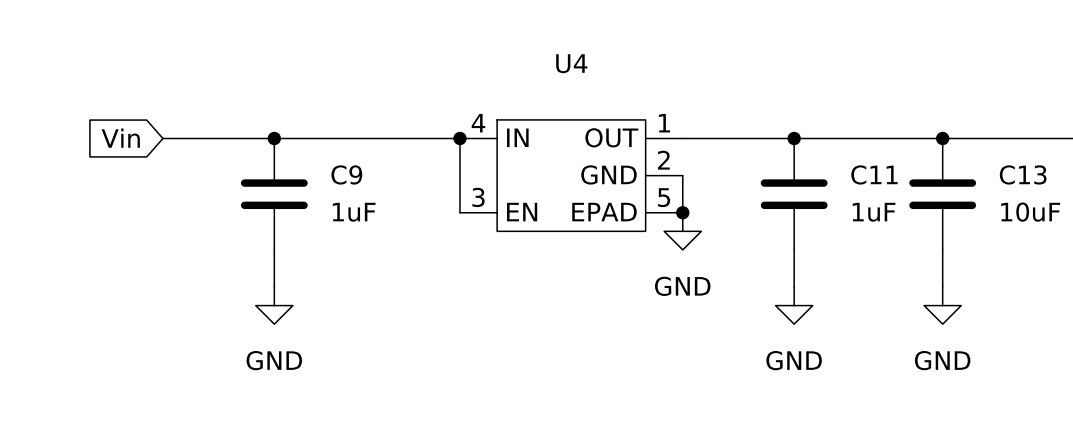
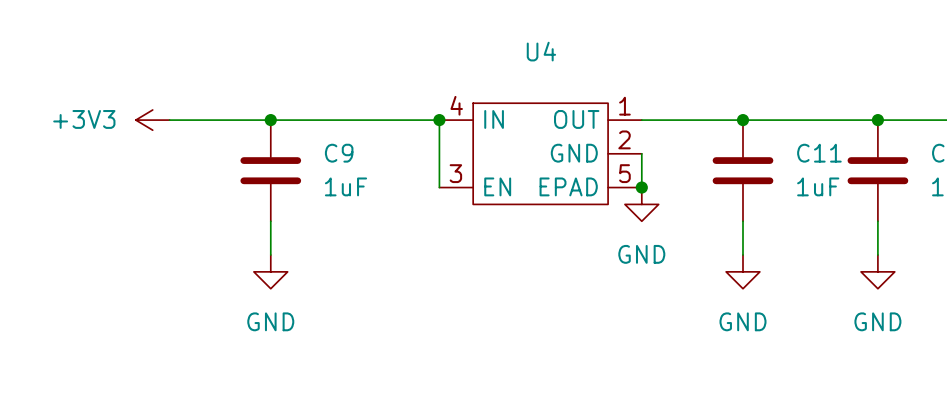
global label: Vin (120, 138) -> none
power symbol: none -> +3V3 (152, 120)

